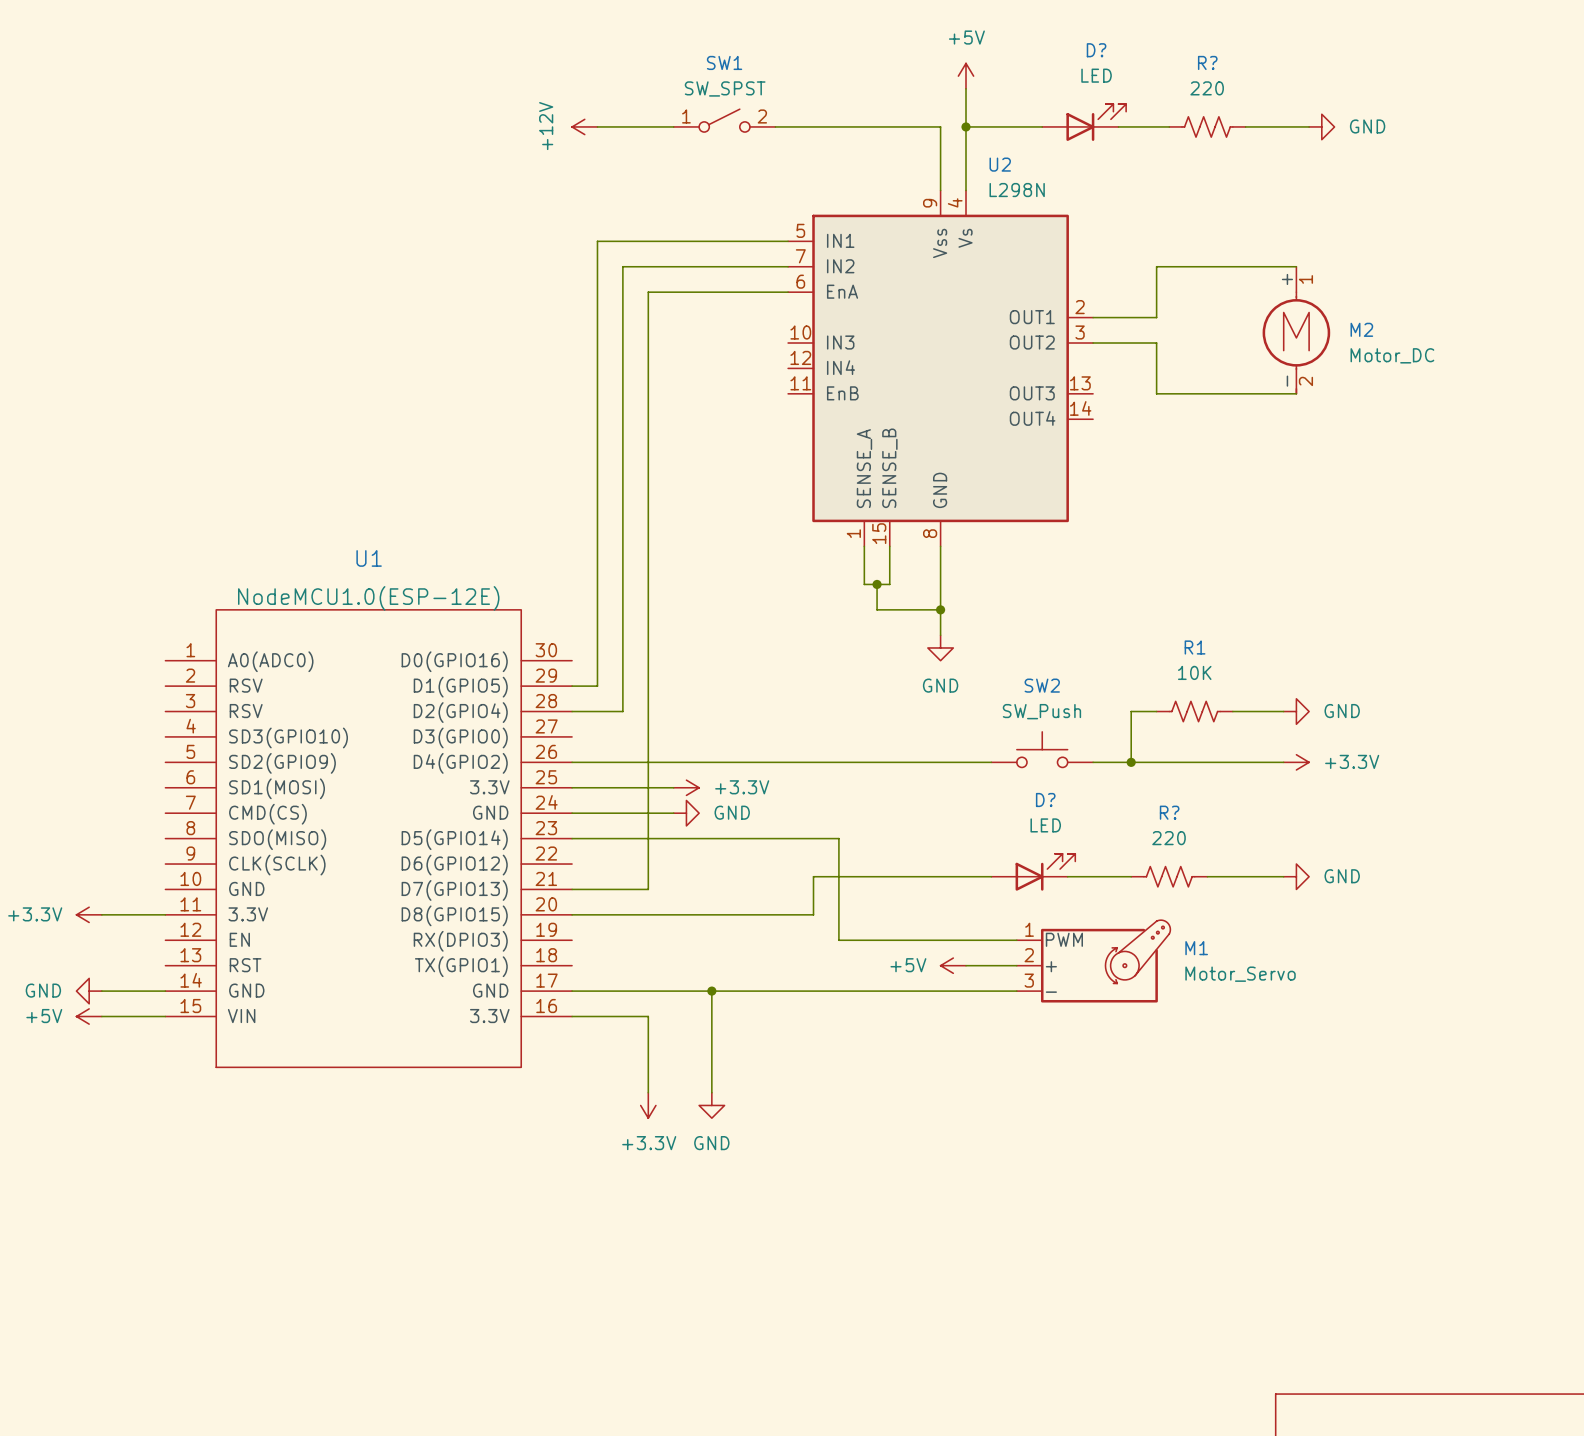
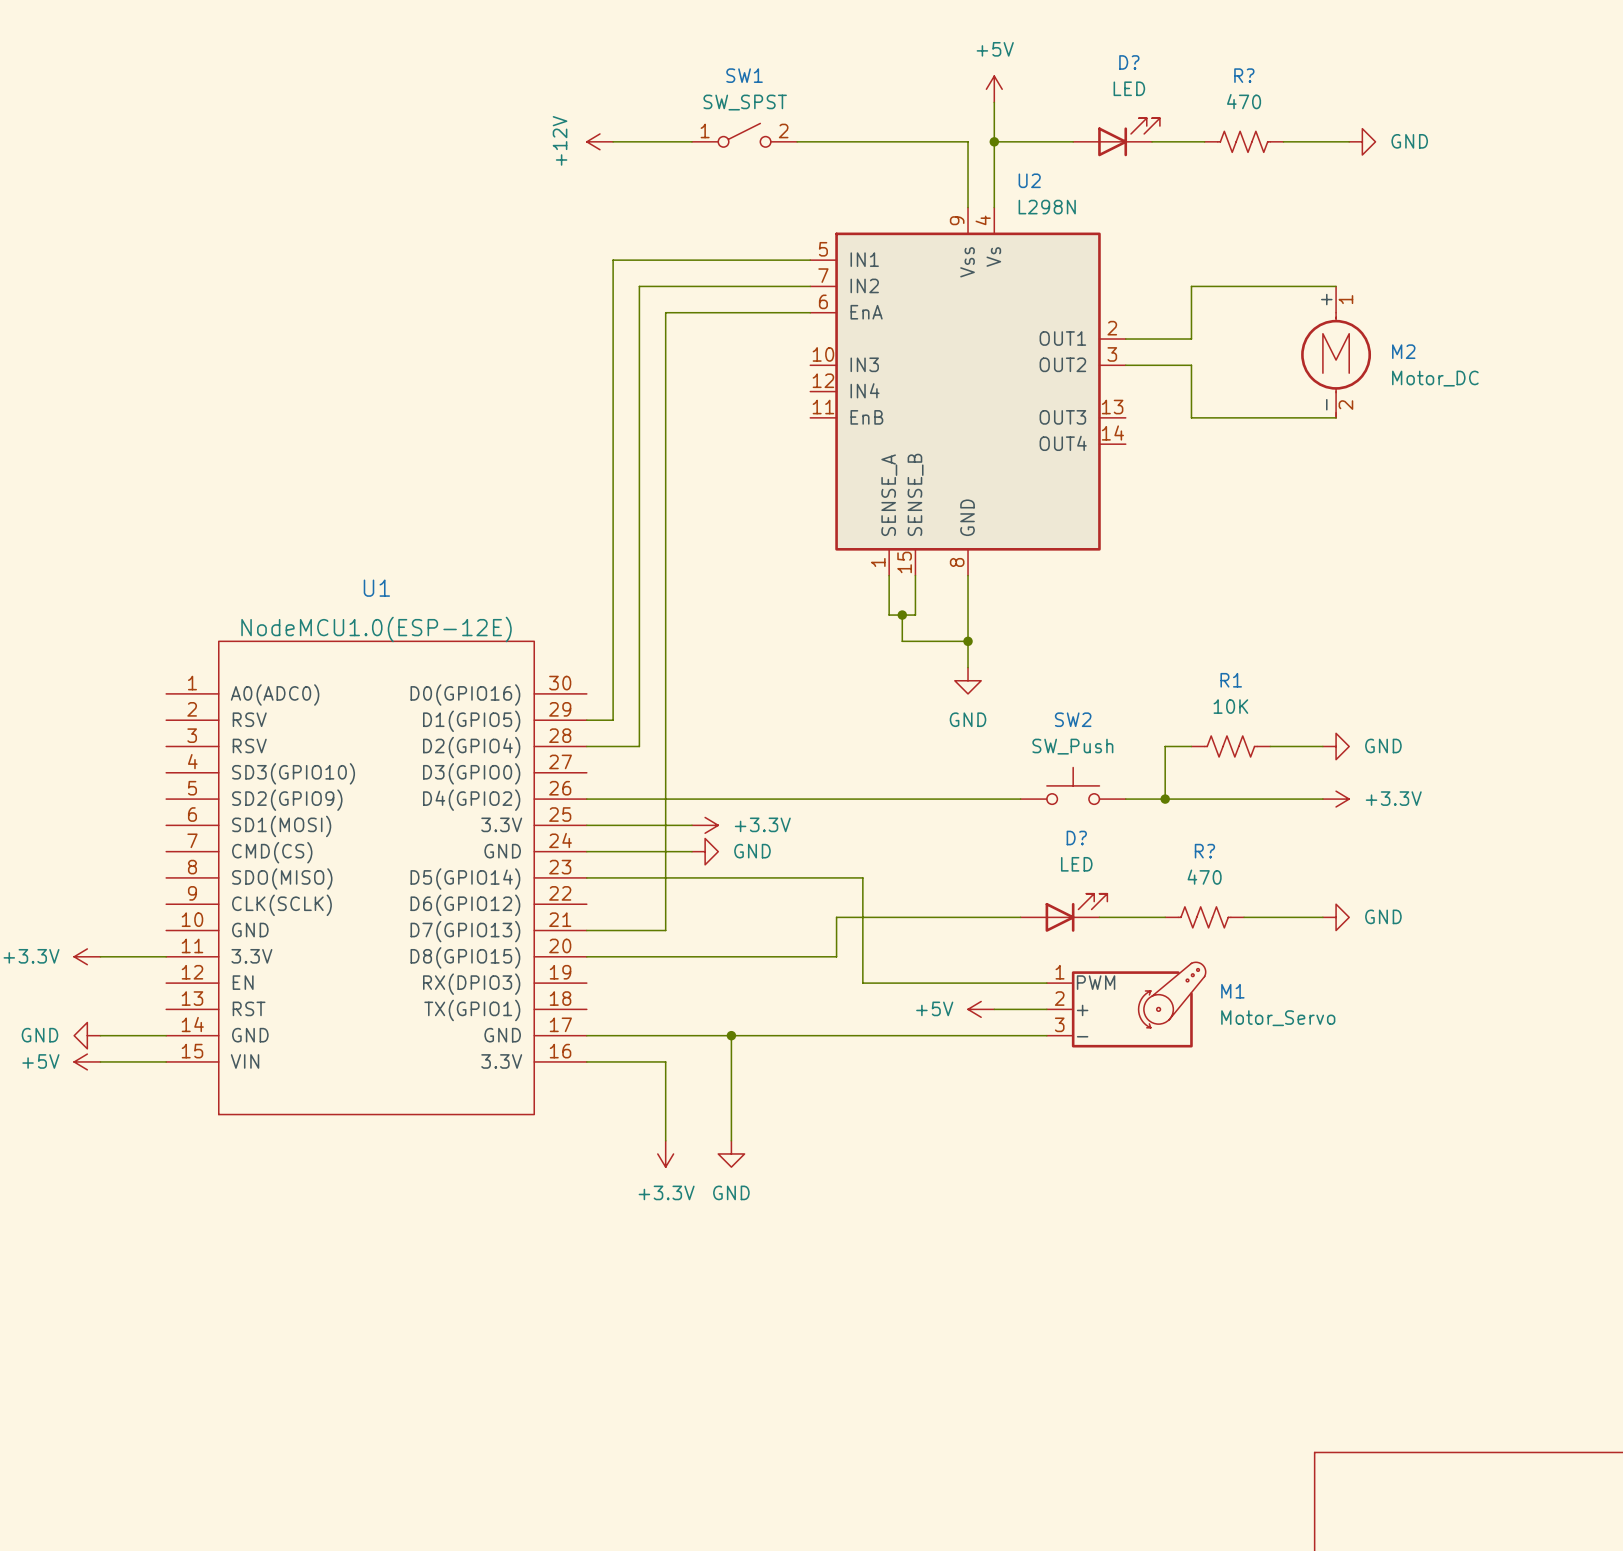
R? value: 220 (1207, 88) -> 470 (1244, 101)
R? value: 220 (1169, 838) -> 470 (1204, 877)

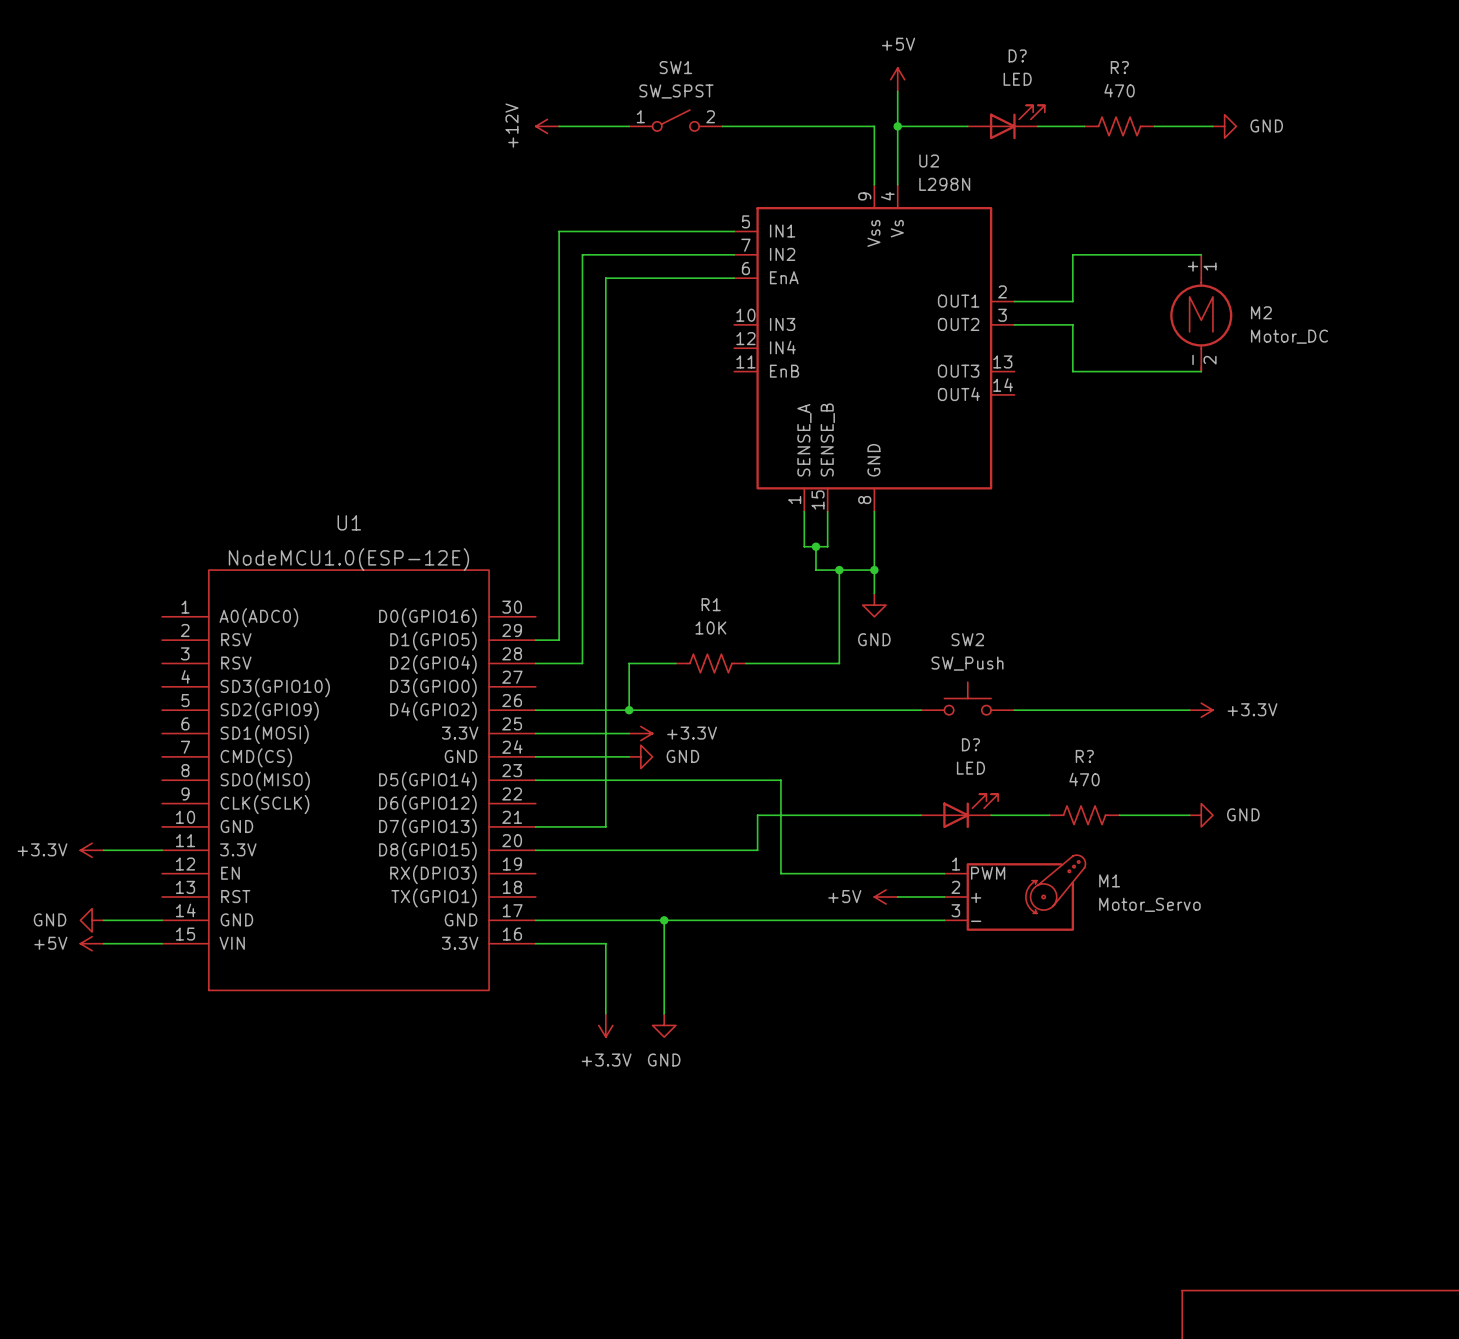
wire: none -> (839, 570) (839, 663) (745, 663)
junction: none -> (839, 570)
wire: none -> (675, 663) (629, 663) (629, 710)
wire: (1191, 746) (1165, 746) (1165, 799) -> none
R1 position: (1230, 746) -> (710, 663)
wire: (1270, 746) (1322, 746) -> none
power symbol: GND (1336, 746) -> none
junction: none -> (629, 710)
junction: (1165, 799) -> none

